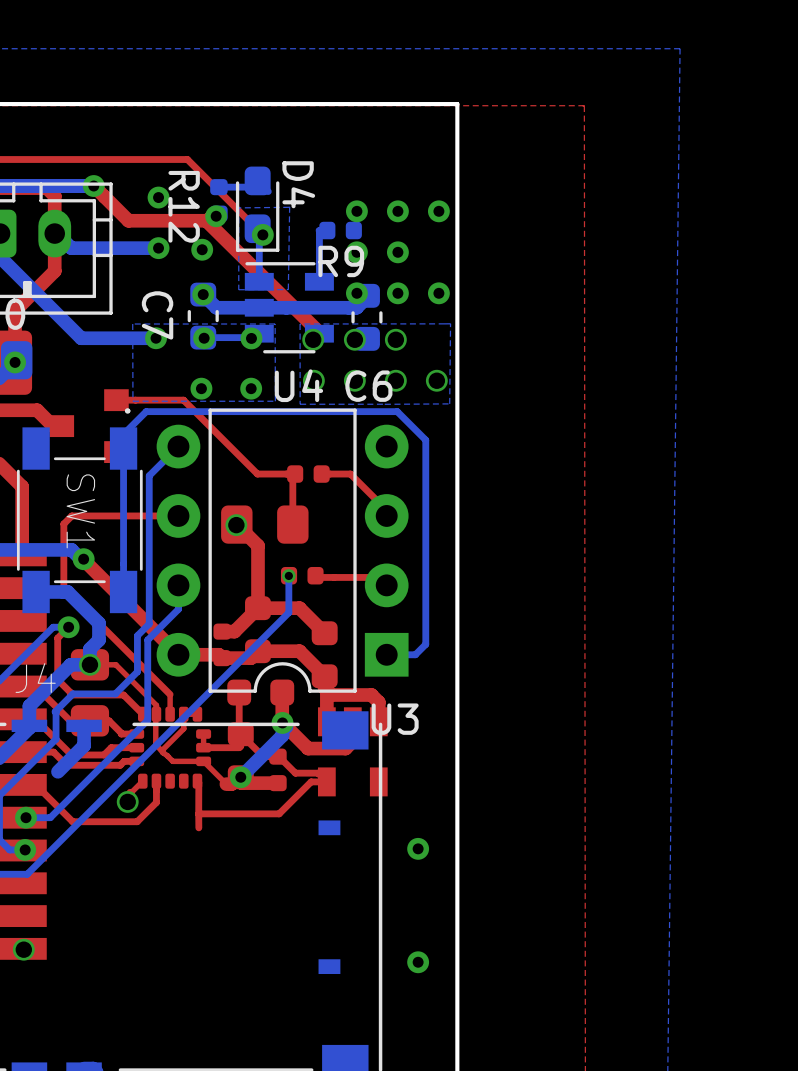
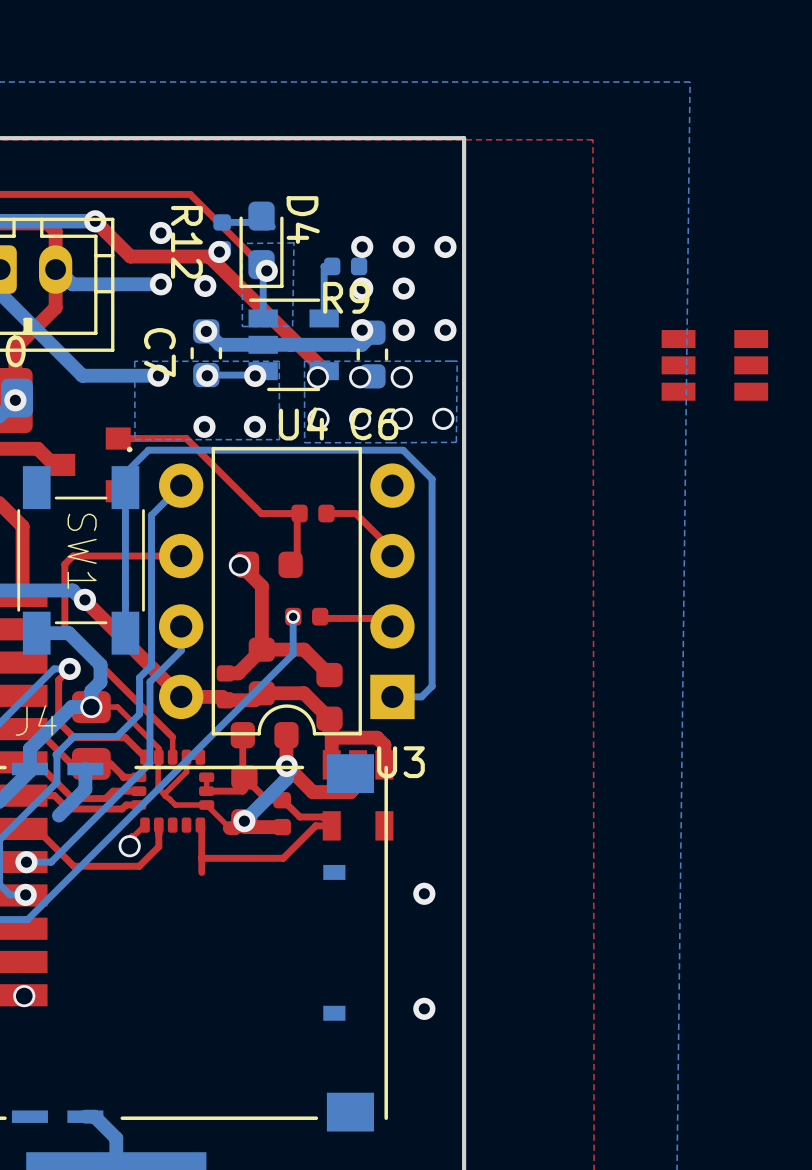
part: none -> (714, 365)
part footprint: [221, 505, 309, 544] -> [234, 551, 303, 578]

